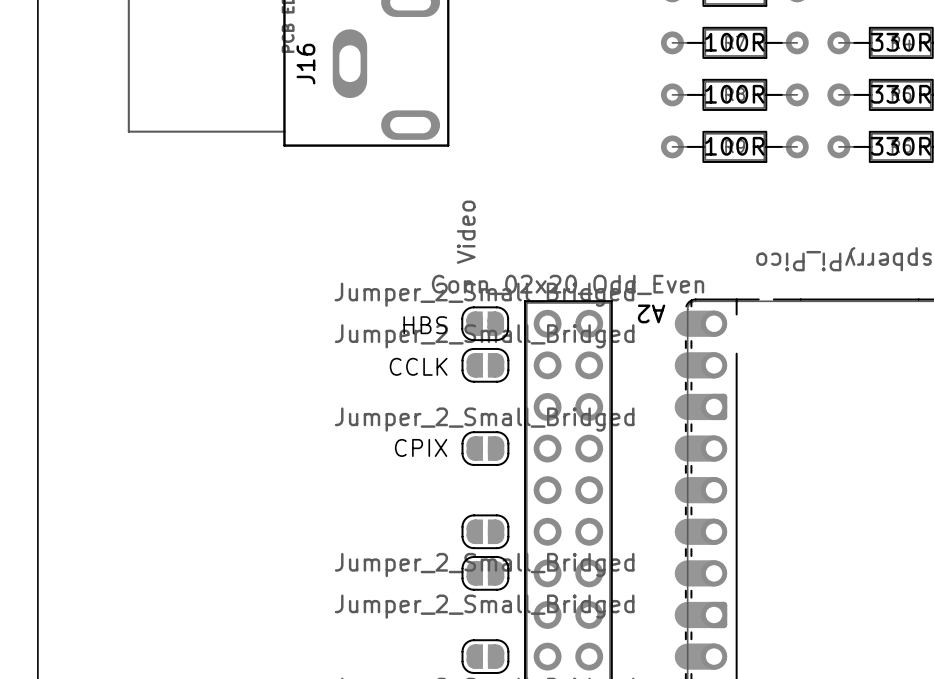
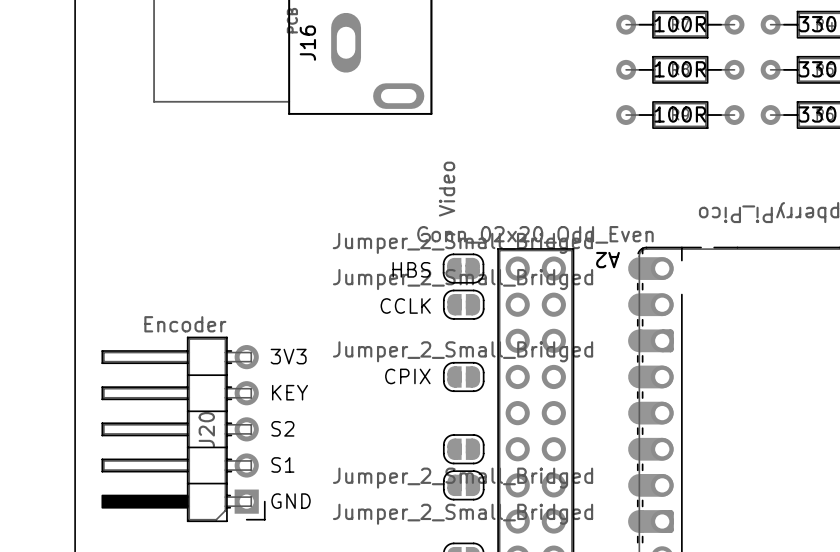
text: none -> 3V3 (288, 356)
text: none -> KEY (290, 392)
J20: none -> Encoder (183, 429)
text: none -> S2 (282, 428)
text: none -> S1 (282, 464)
text: none -> GND (291, 501)

